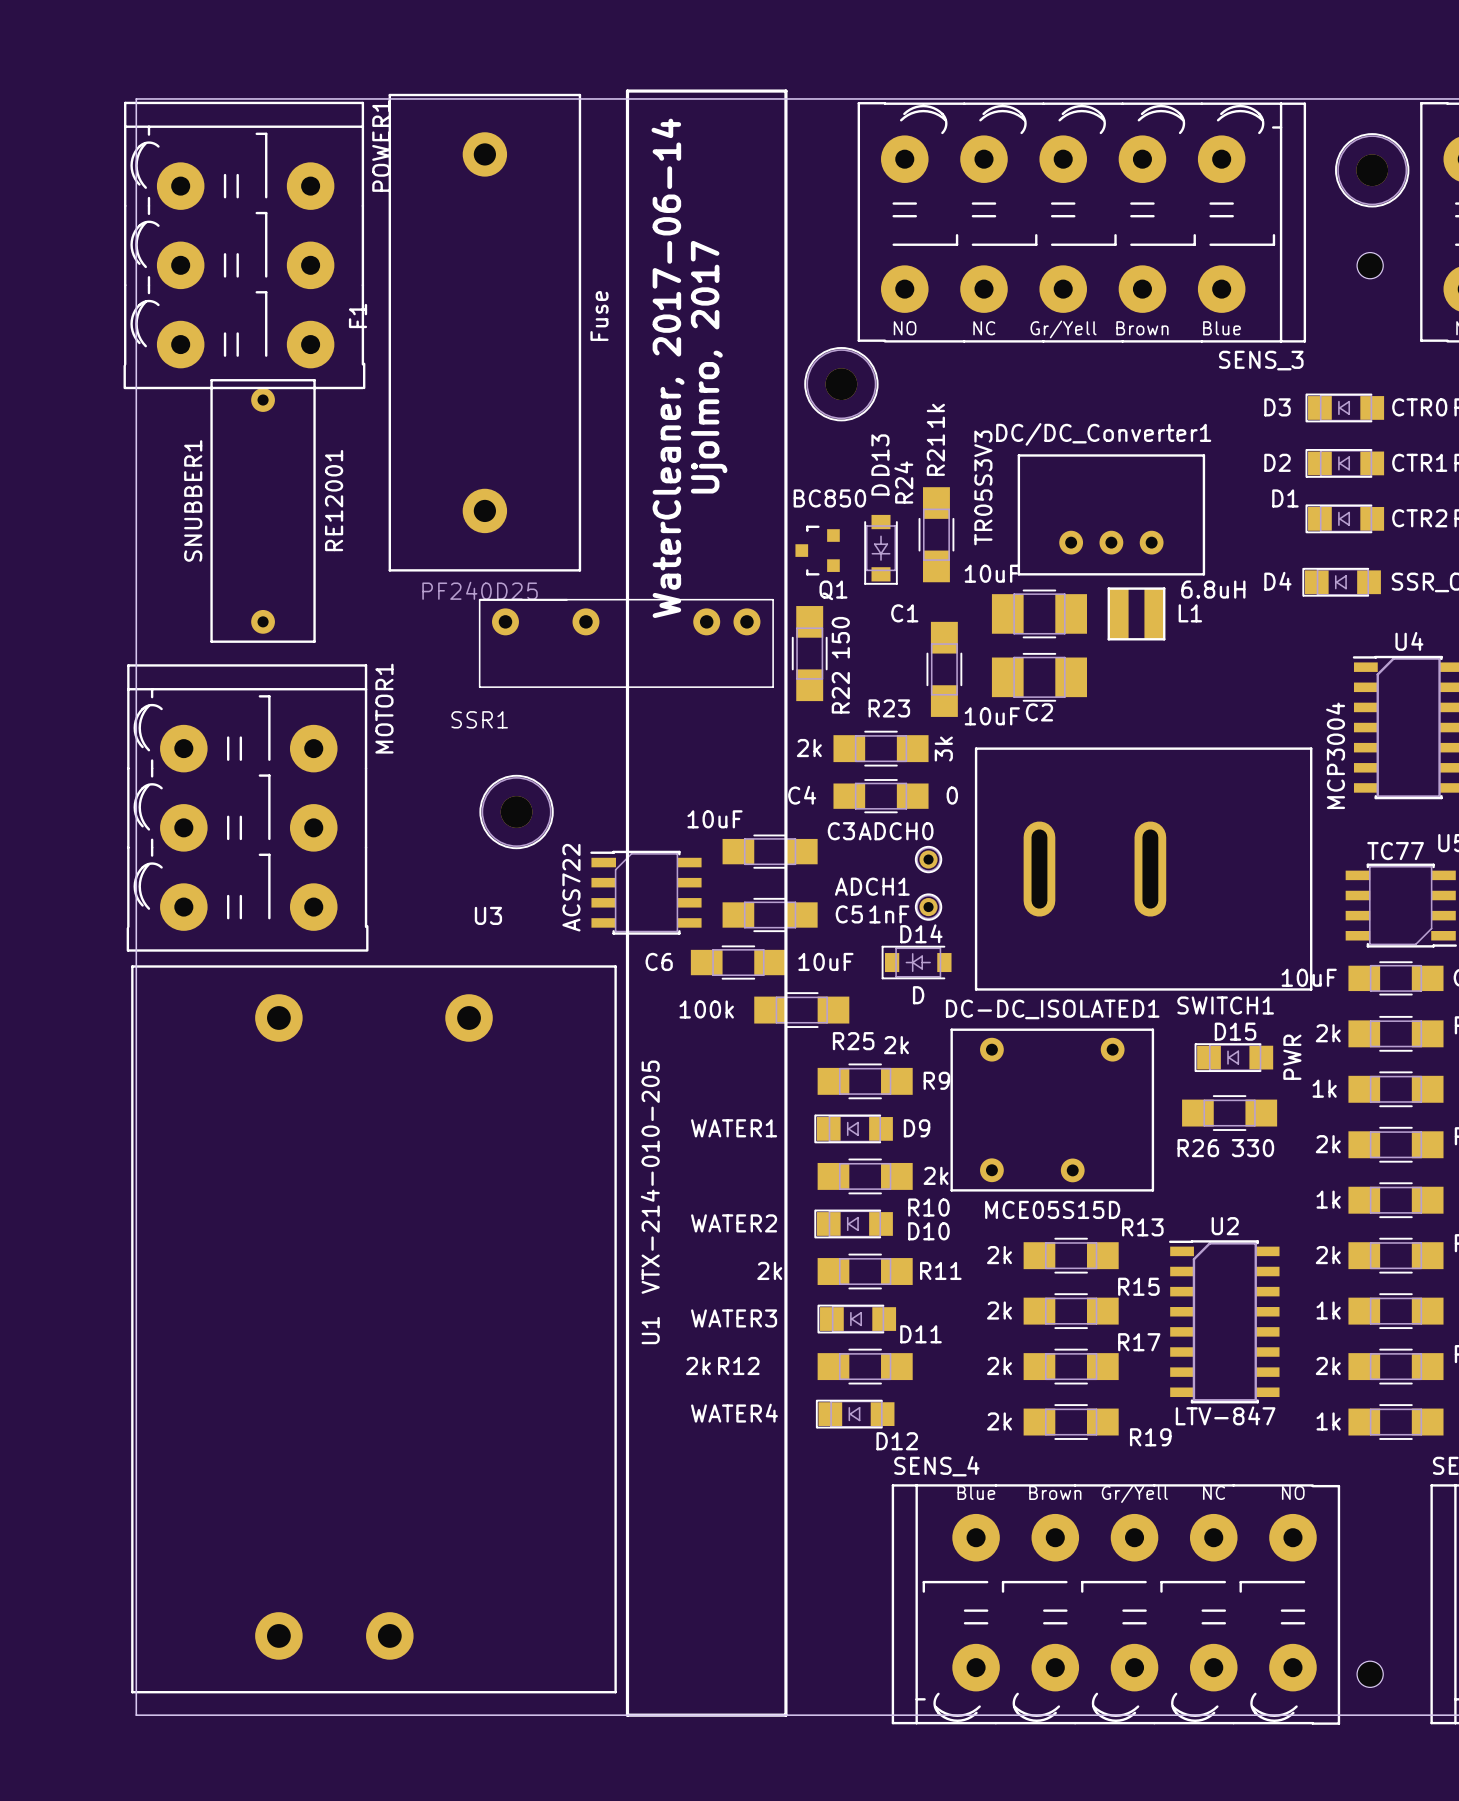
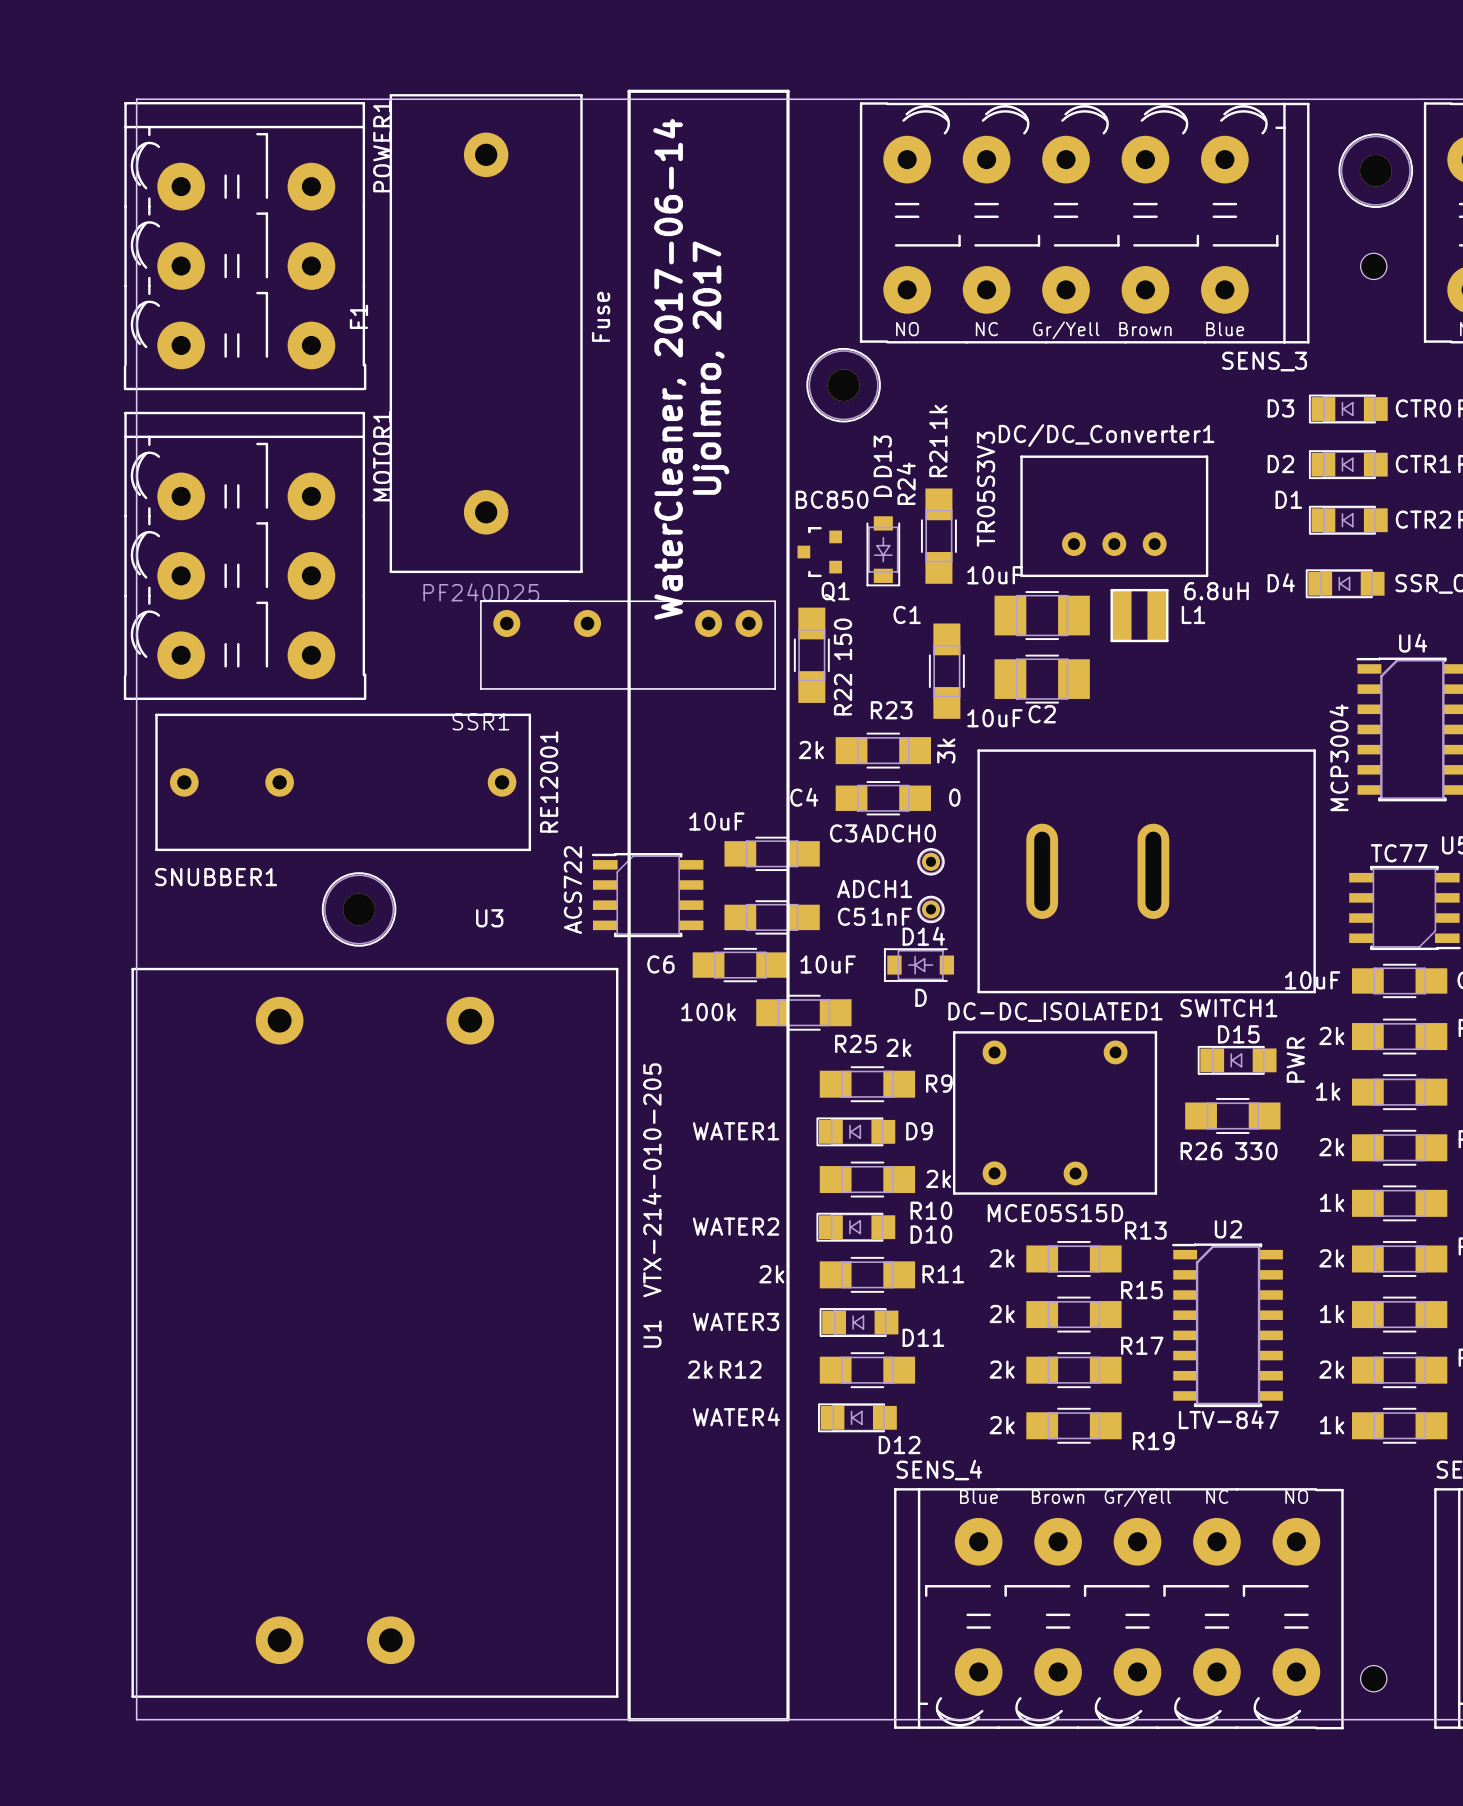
SNUBBER1 footprint: [210, 379, 316, 643] -> [155, 713, 532, 852]
SNUBBER1 name position: SNUBBER1 (193, 500) -> SNUBBER1 (216, 877)
SNUBBER1 value position: RE12001 (334, 500) -> RE12001 (549, 781)
MOTOR1 footprint: [126, 664, 369, 952] -> [123, 411, 367, 701]
part position: (516, 812) -> (359, 909)

